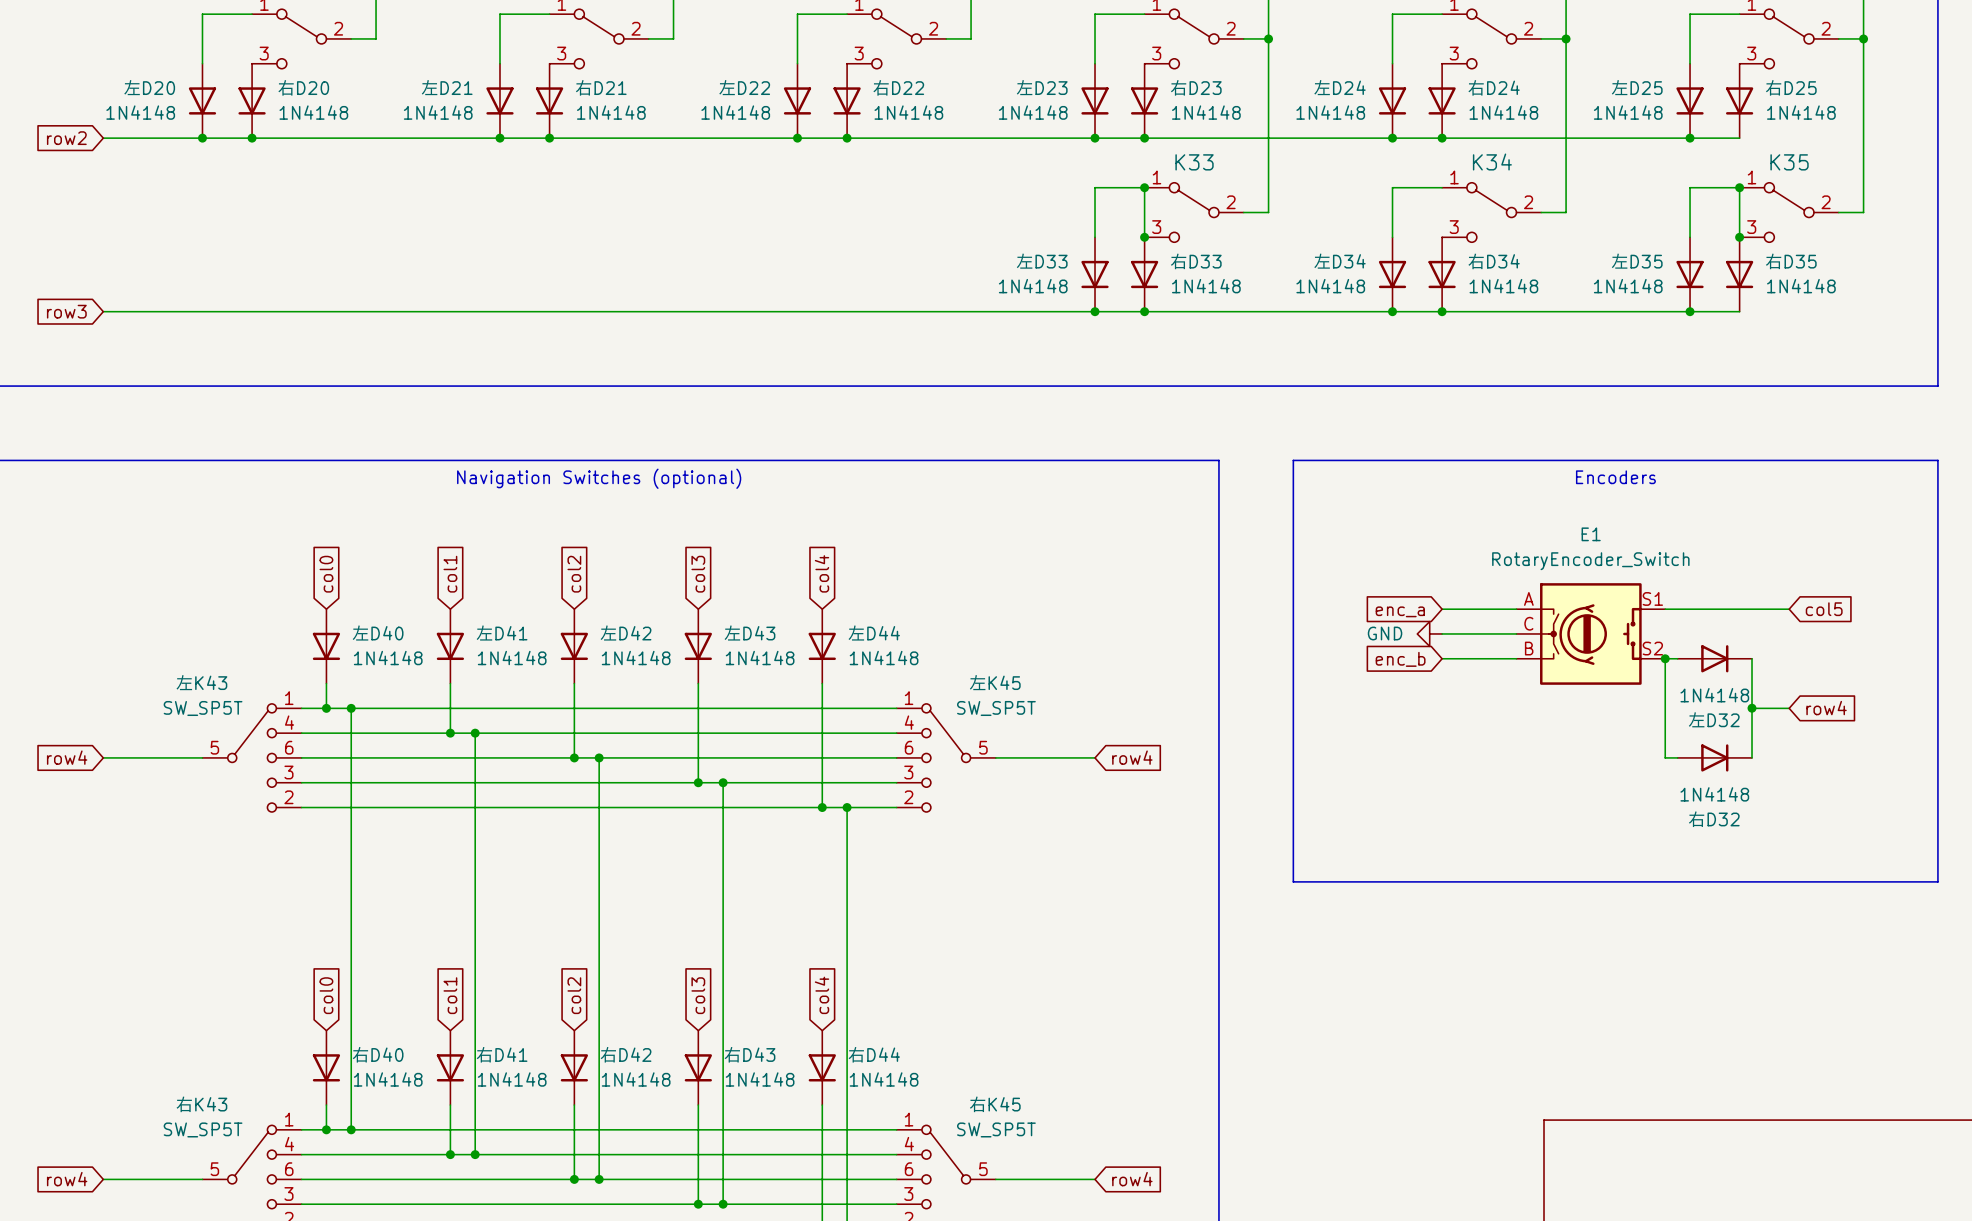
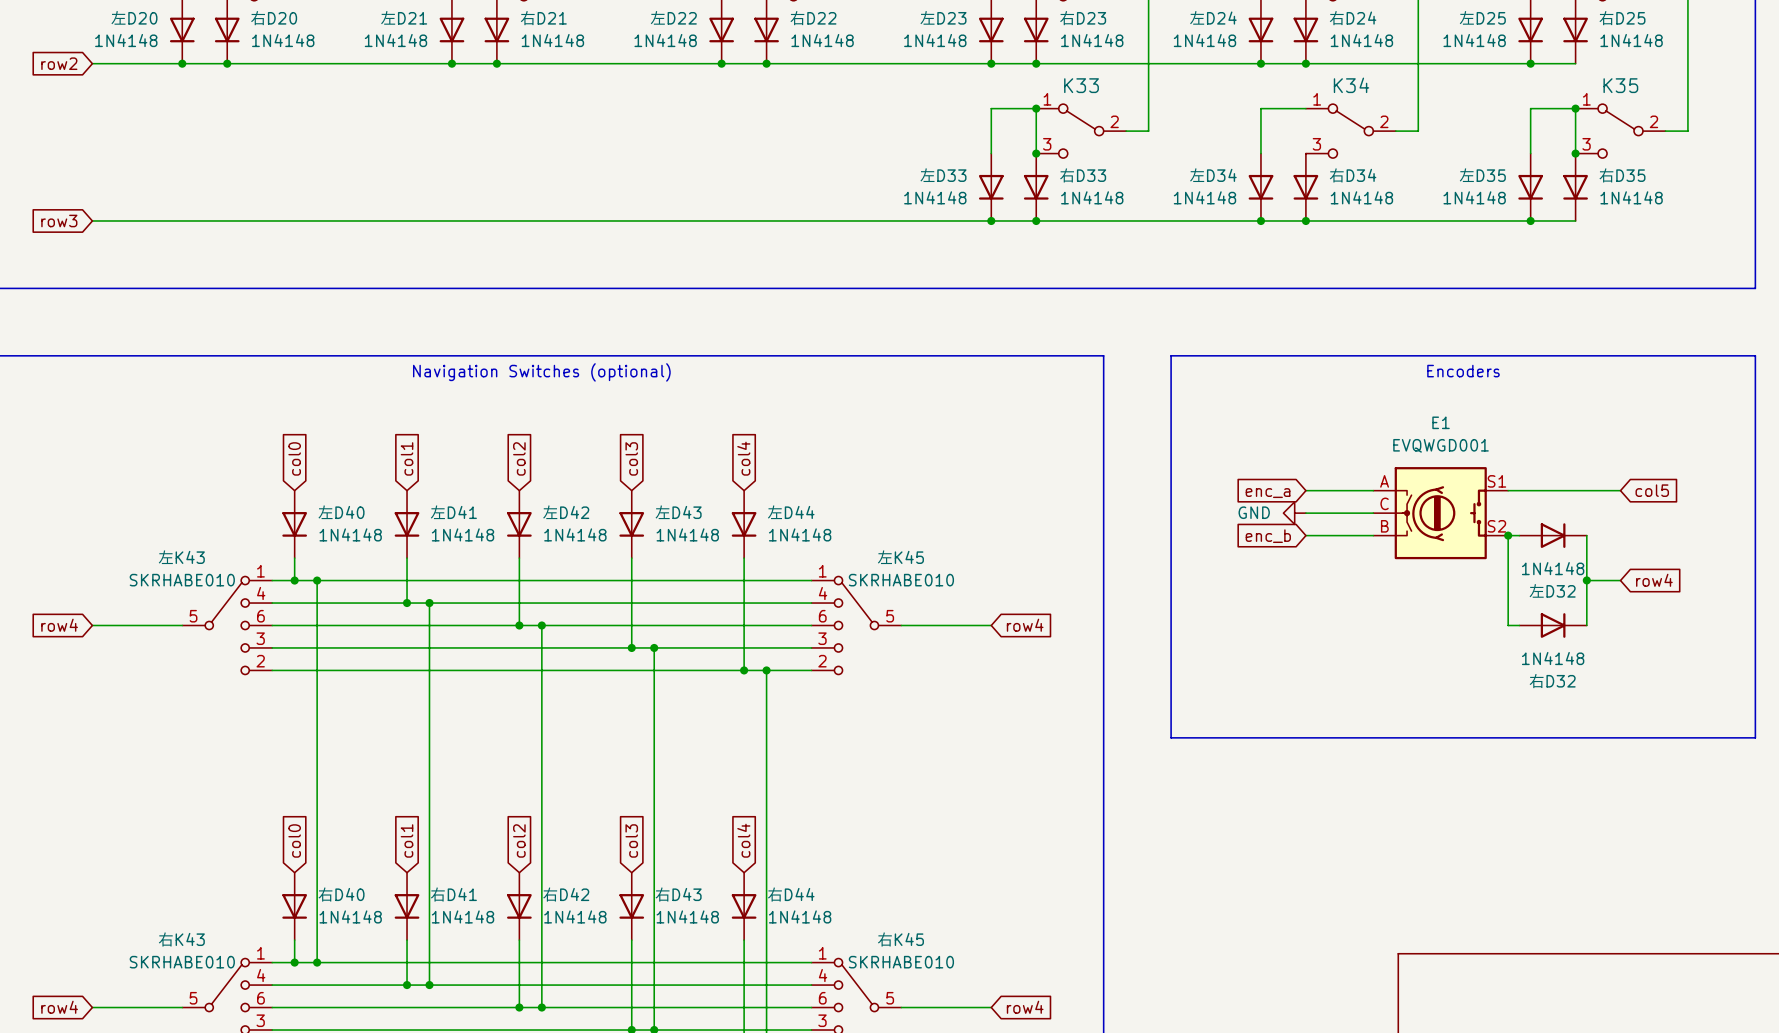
E1 value: RotaryEncoder_Switch (1590, 561) -> EVQWGD001 (1441, 445)
左K43 value: SW_SP5T (203, 708) -> SKRHABE010 (182, 580)
左K45 value: SW_SP5T (996, 708) -> SKRHABE010 (901, 580)
右K43 value: SW_SP5T (203, 1129) -> SKRHABE010 (182, 962)
右K45 value: SW_SP5T (996, 1129) -> SKRHABE010 (901, 962)

